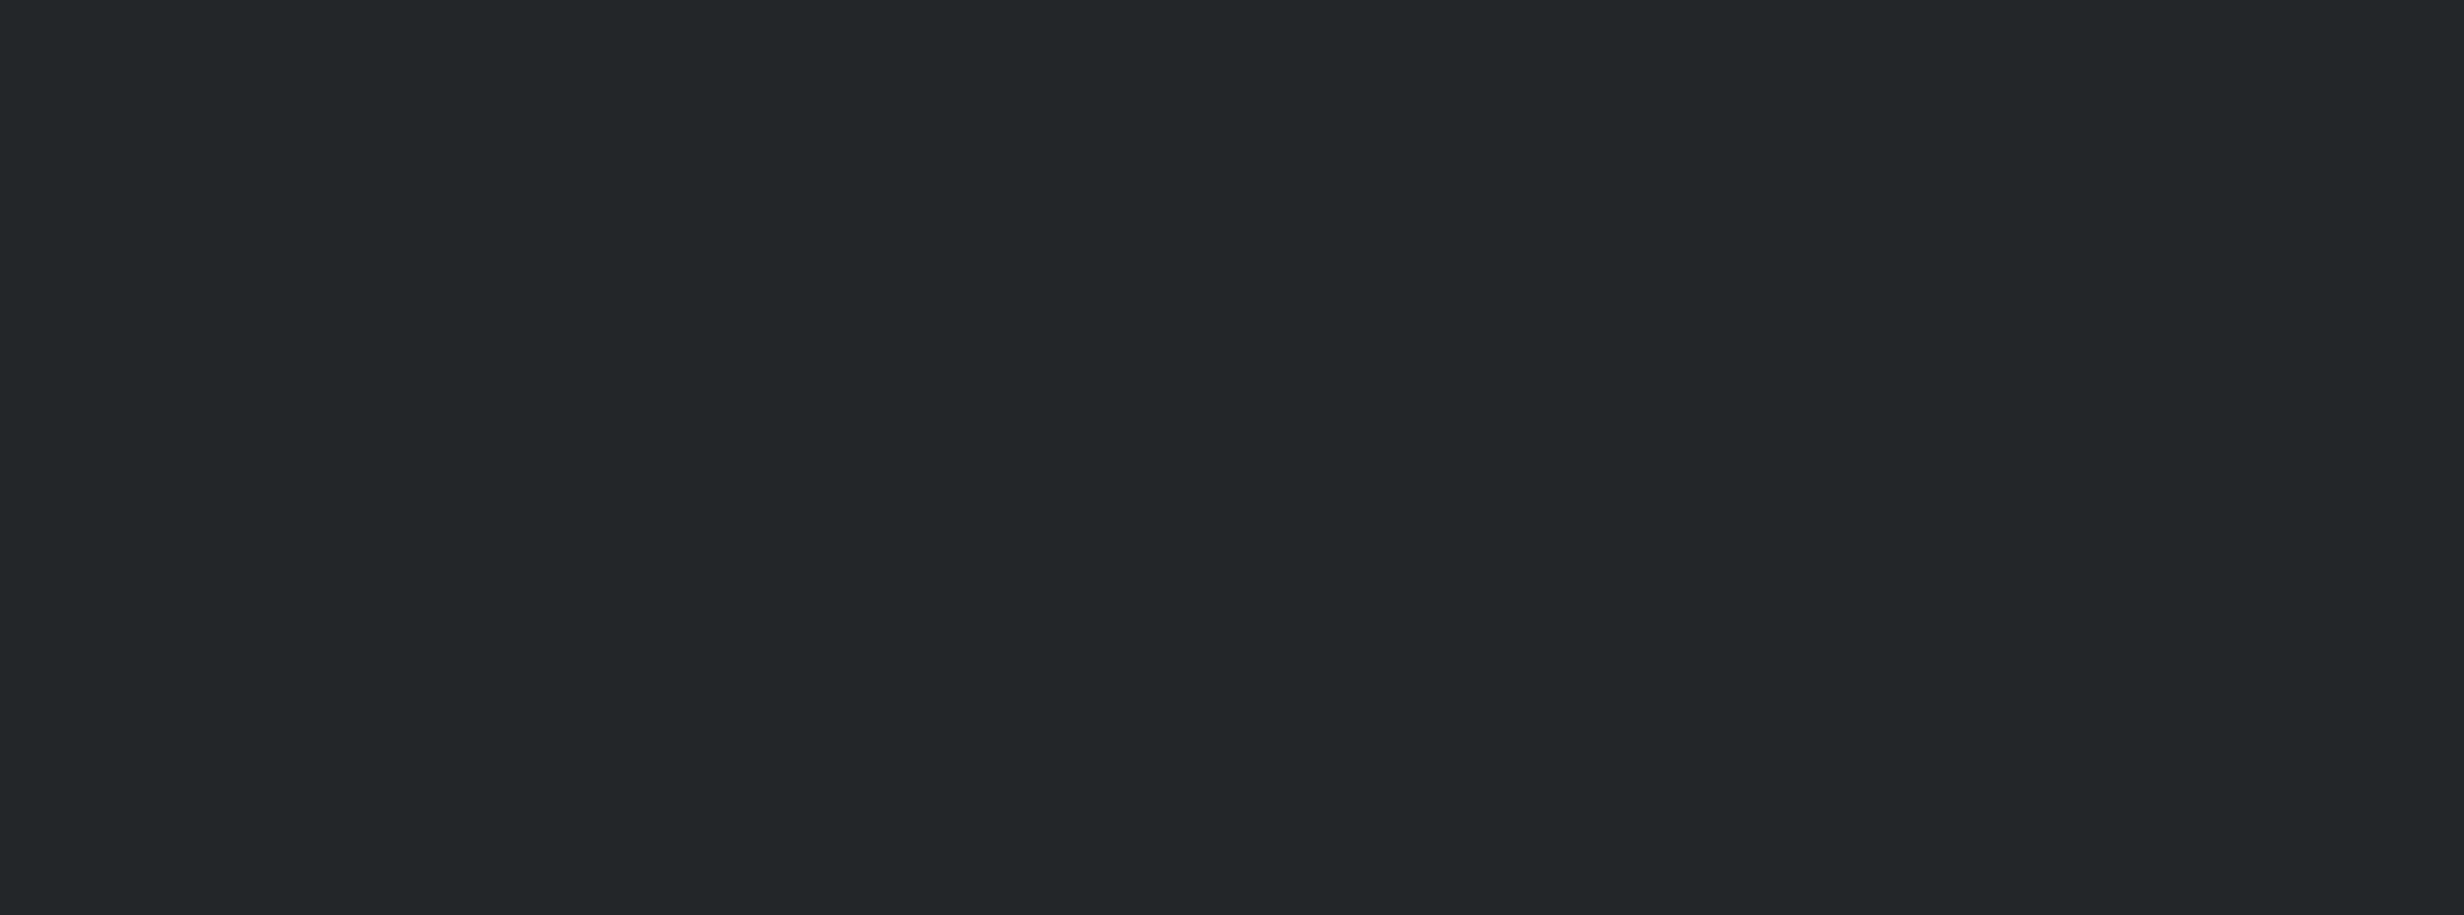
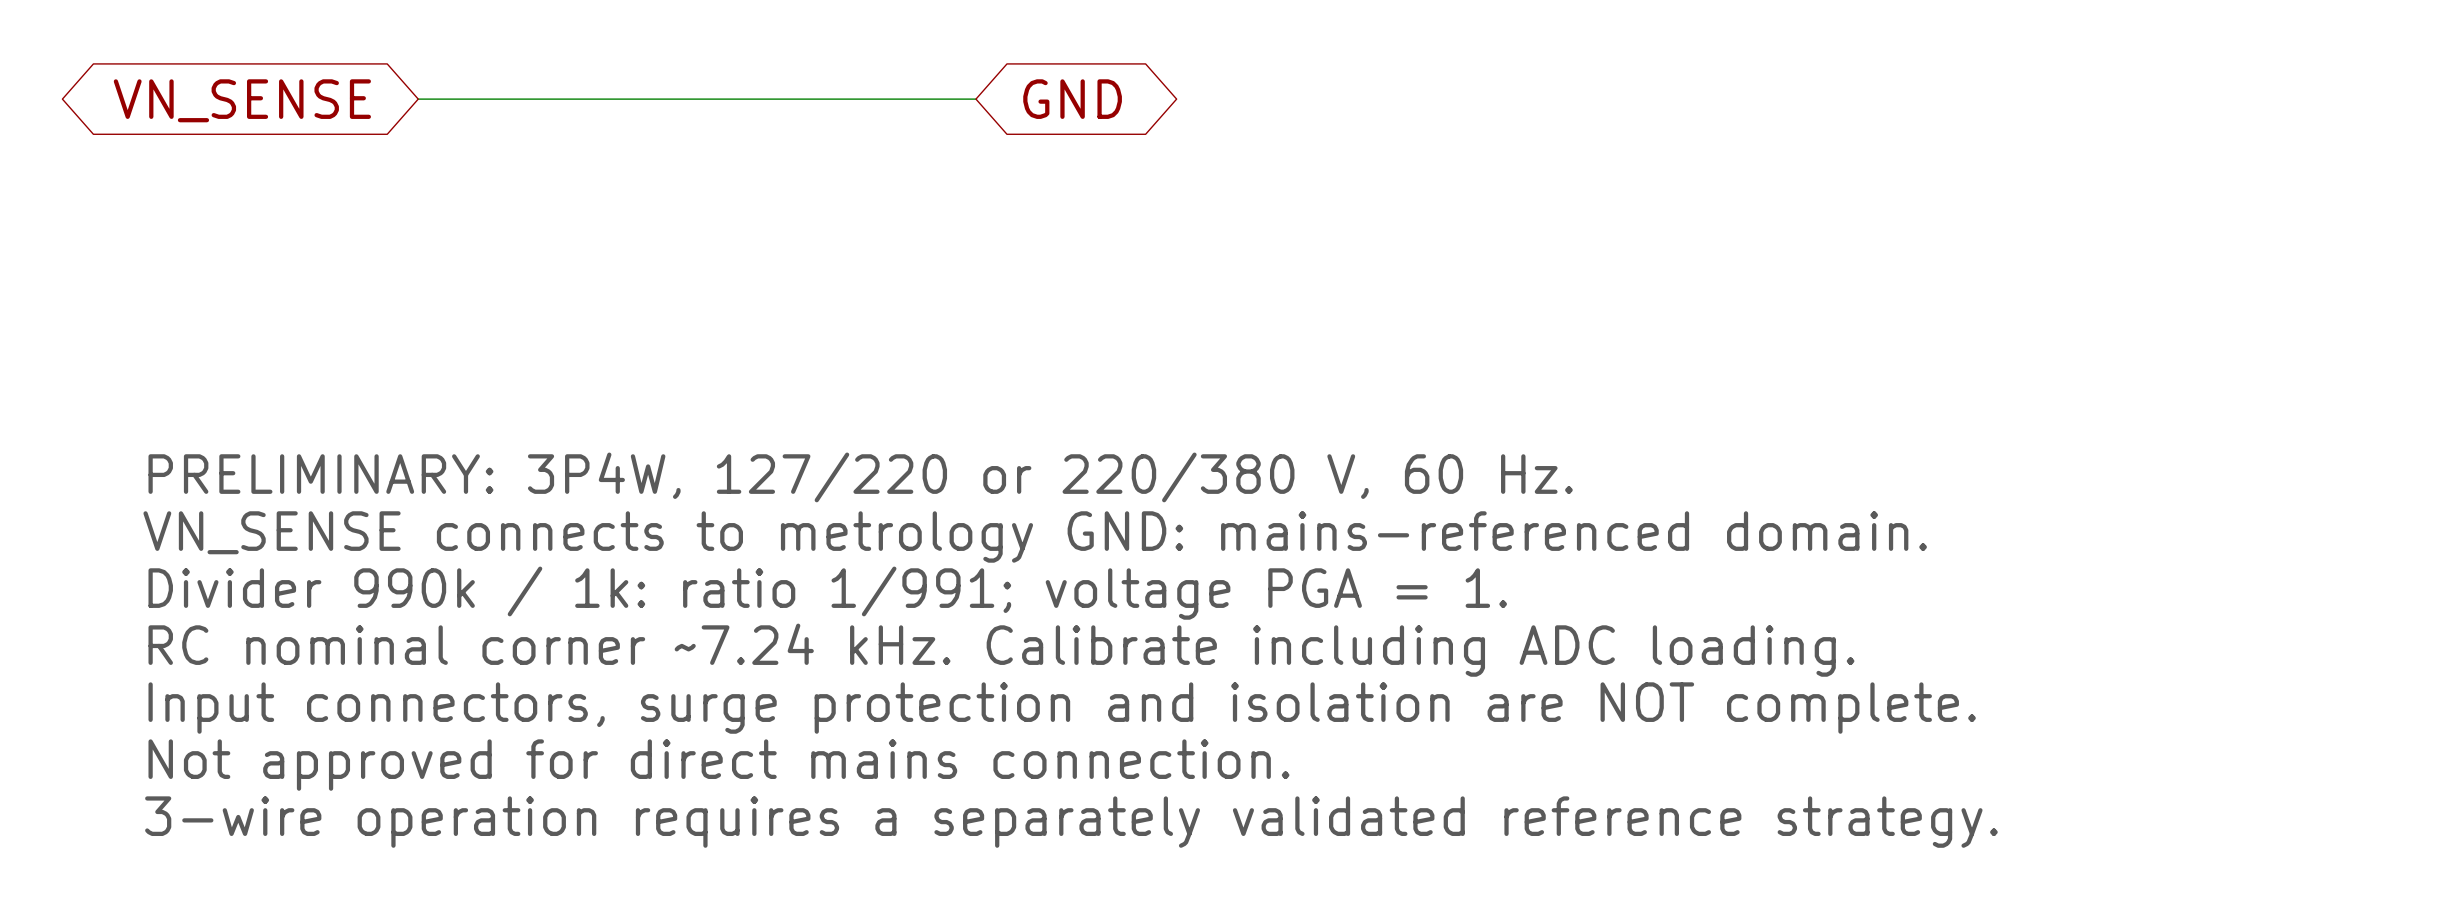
wire: none -> (418, 99) (975, 99)
global label: none -> GND (1072, 99)
global label: none -> VN_SENSE (242, 100)
text: none -> PRELIMINARY: 3P4W, 127/220 or 220/380 V, 60 Hz. (860, 477)
text: none -> VN_SENSE connects to metrology GND: mains-referenced domain. (1035, 536)
text: none -> Divider 990k / 1k: ratio 1/991; voltage PGA = 1. (827, 593)
text: none -> RC nominal corner ~7.24 kHz. Calibrate including ADC loading. (1001, 650)
text: none -> Input connectors, surge protection and isolation are NOT complete. (1062, 708)
text: none -> Not approved for direct mains connection. (718, 765)
text: none -> 3-wire operation requires a separately validated reference strategy. (1071, 822)

